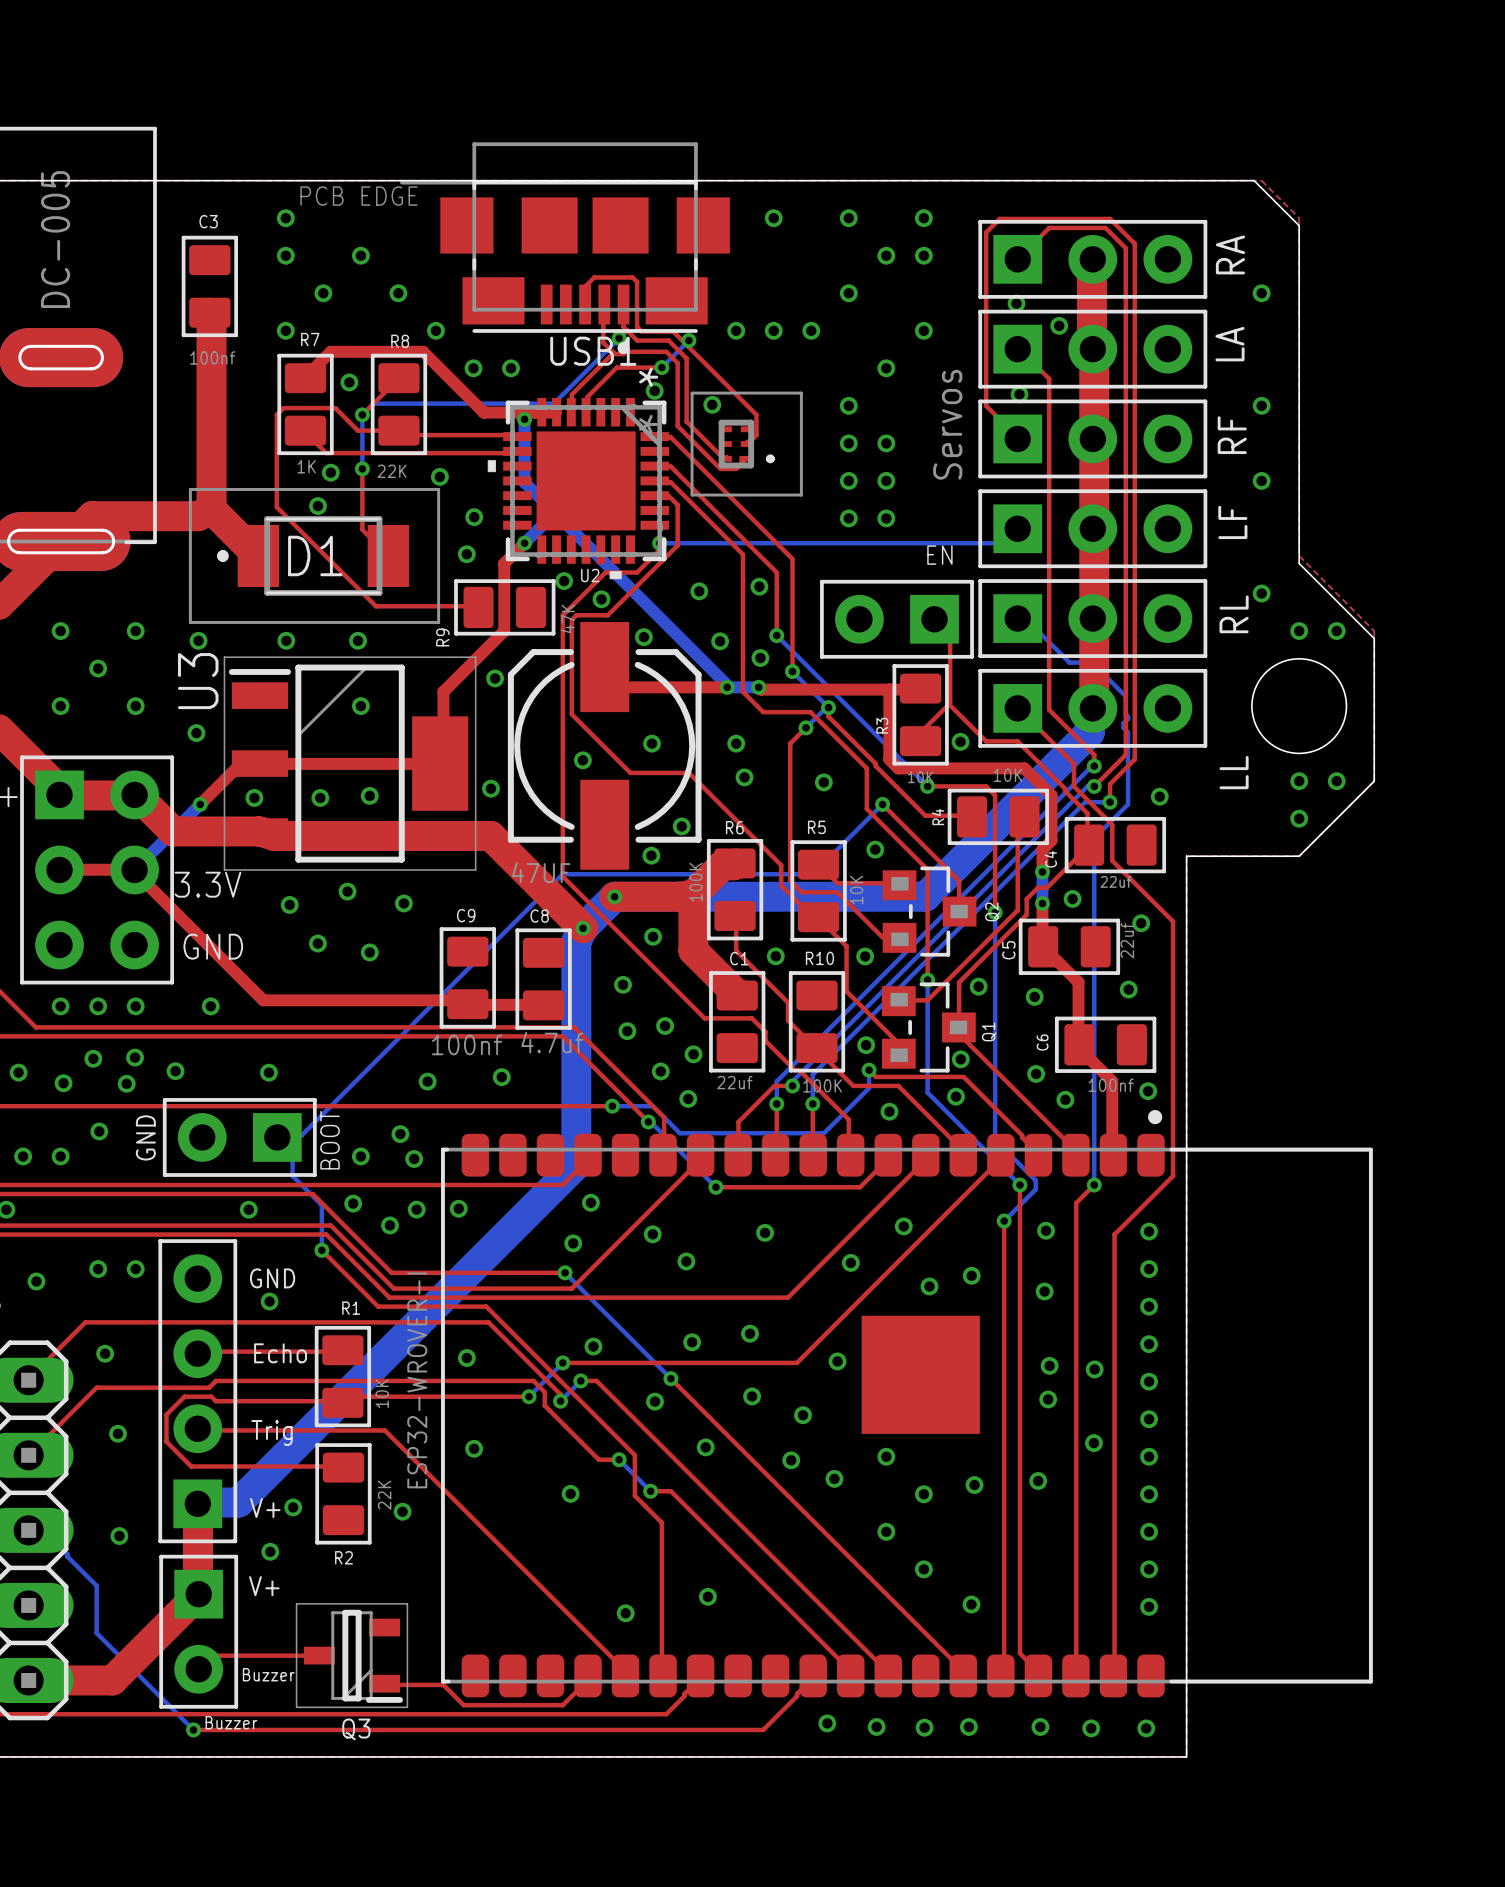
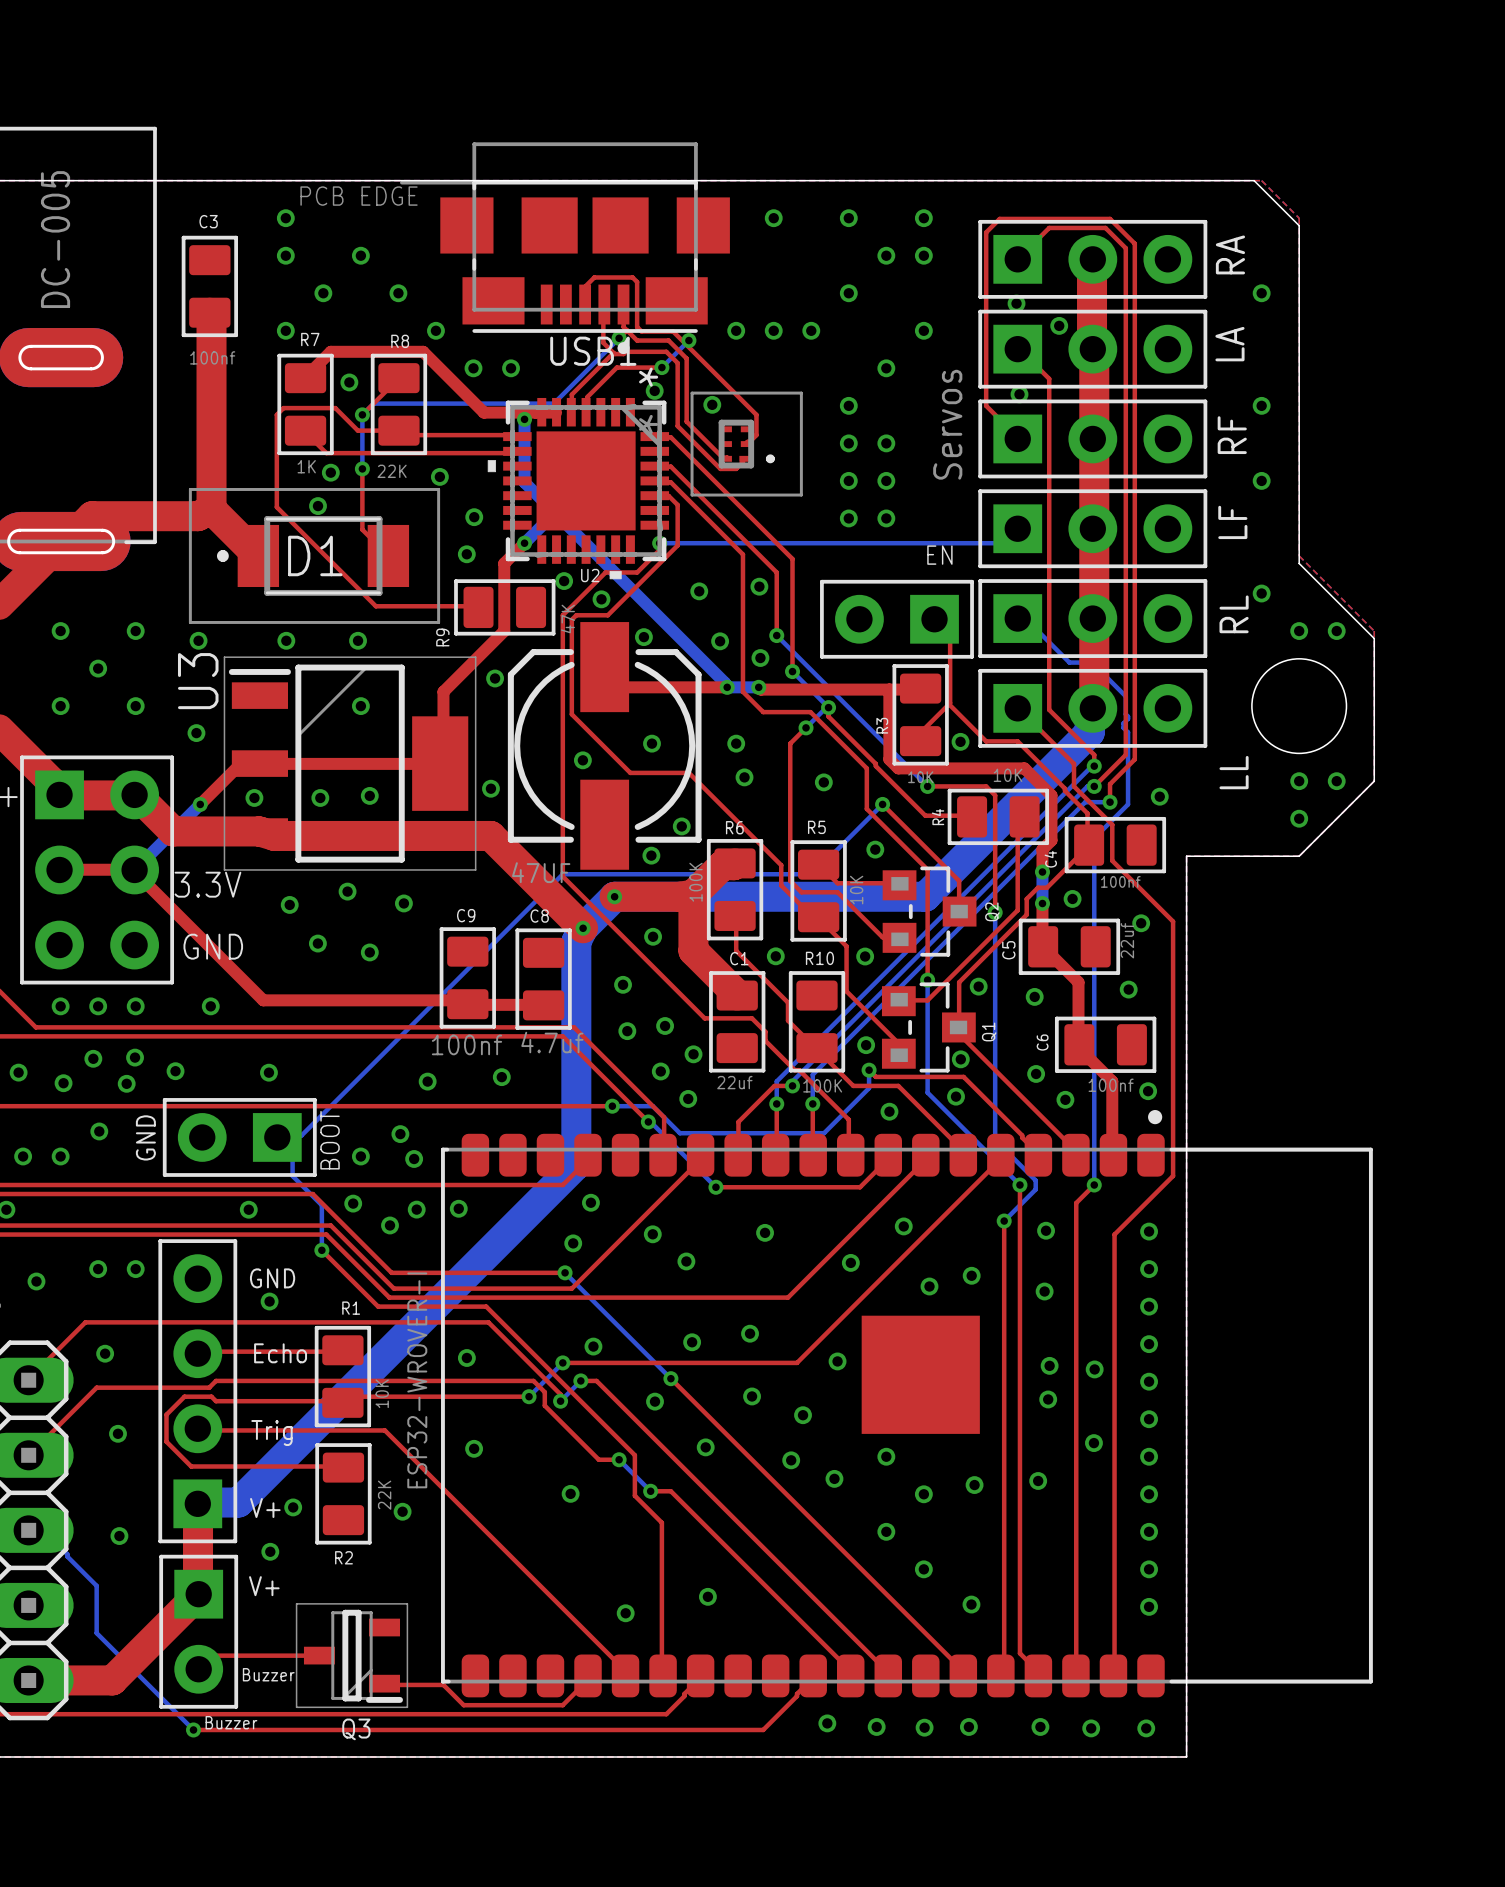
C4 value: 22uf (1116, 881) -> 100nf (1120, 881)

